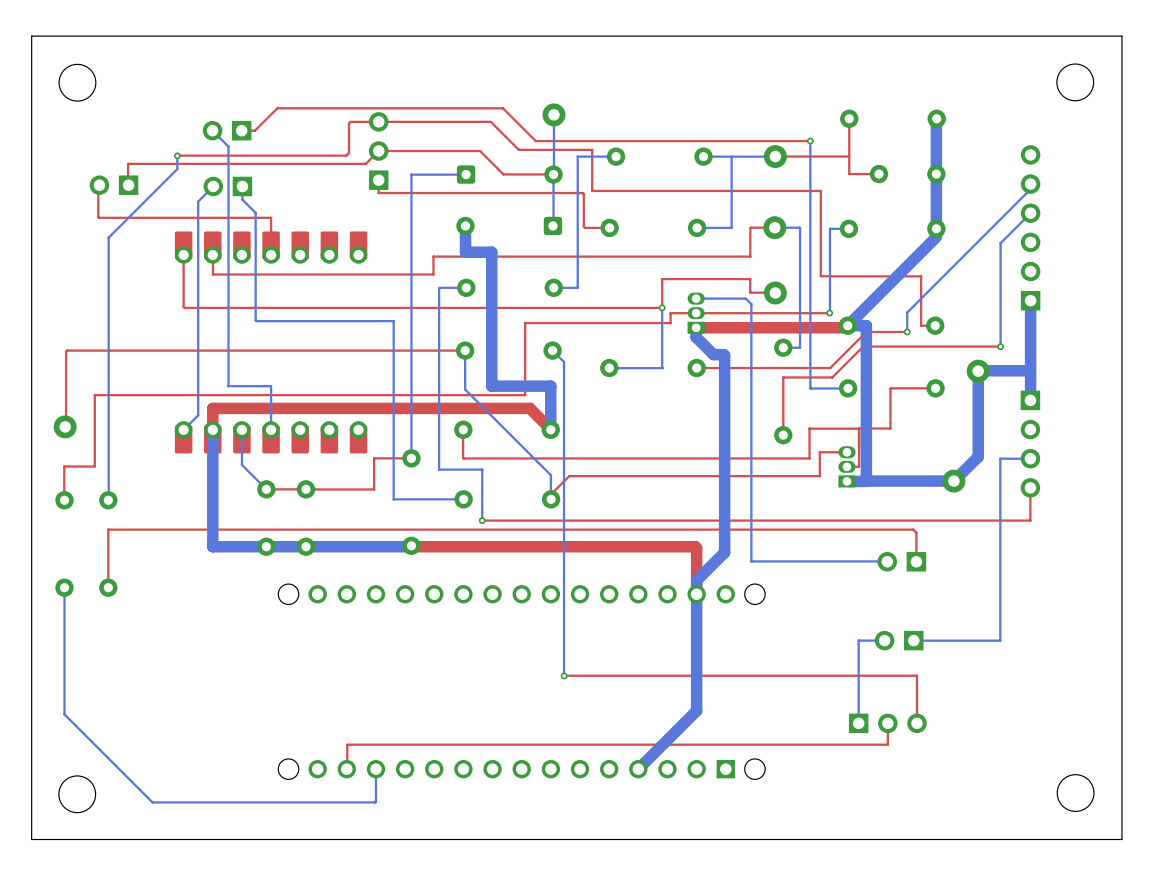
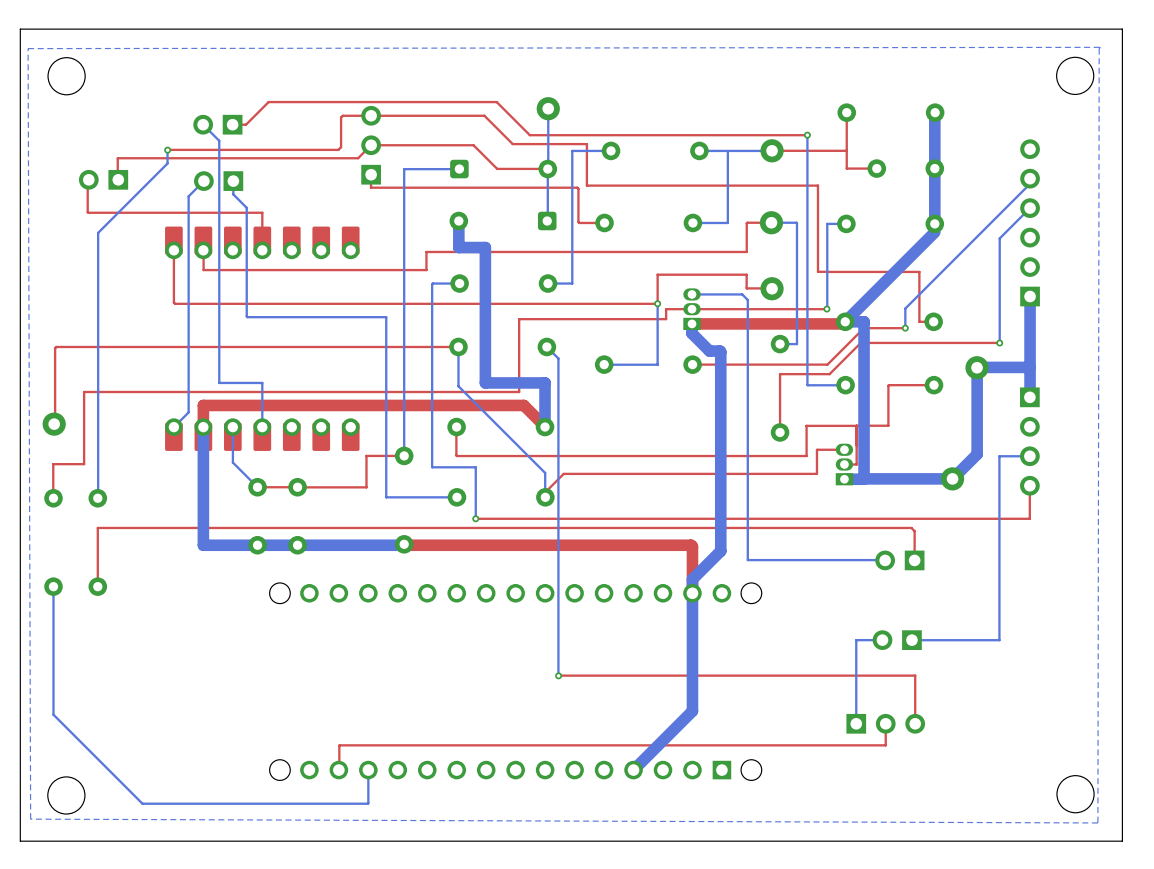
bottom zone outline: none -> (1100, 47) (28, 48) (30, 819) (1097, 822) (1100, 47)

